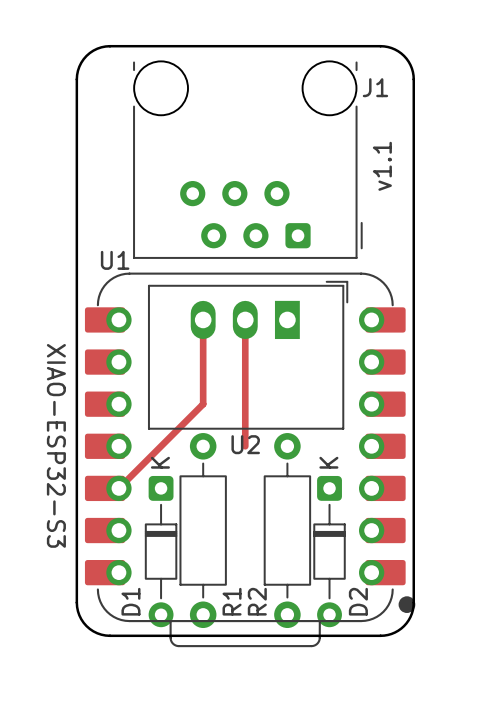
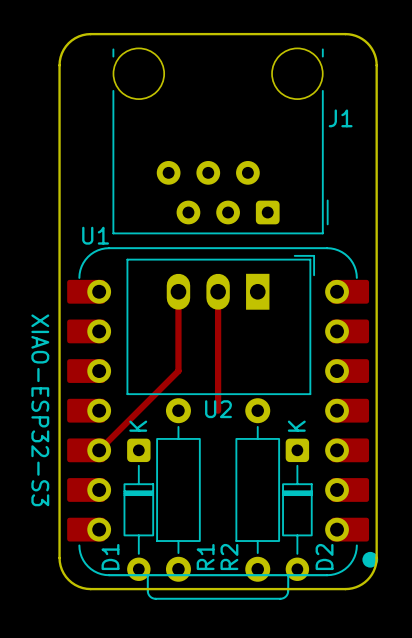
J1 name position: J1 (375, 87) -> J1 (340, 118)
text: v1.1 (382, 166) -> none

